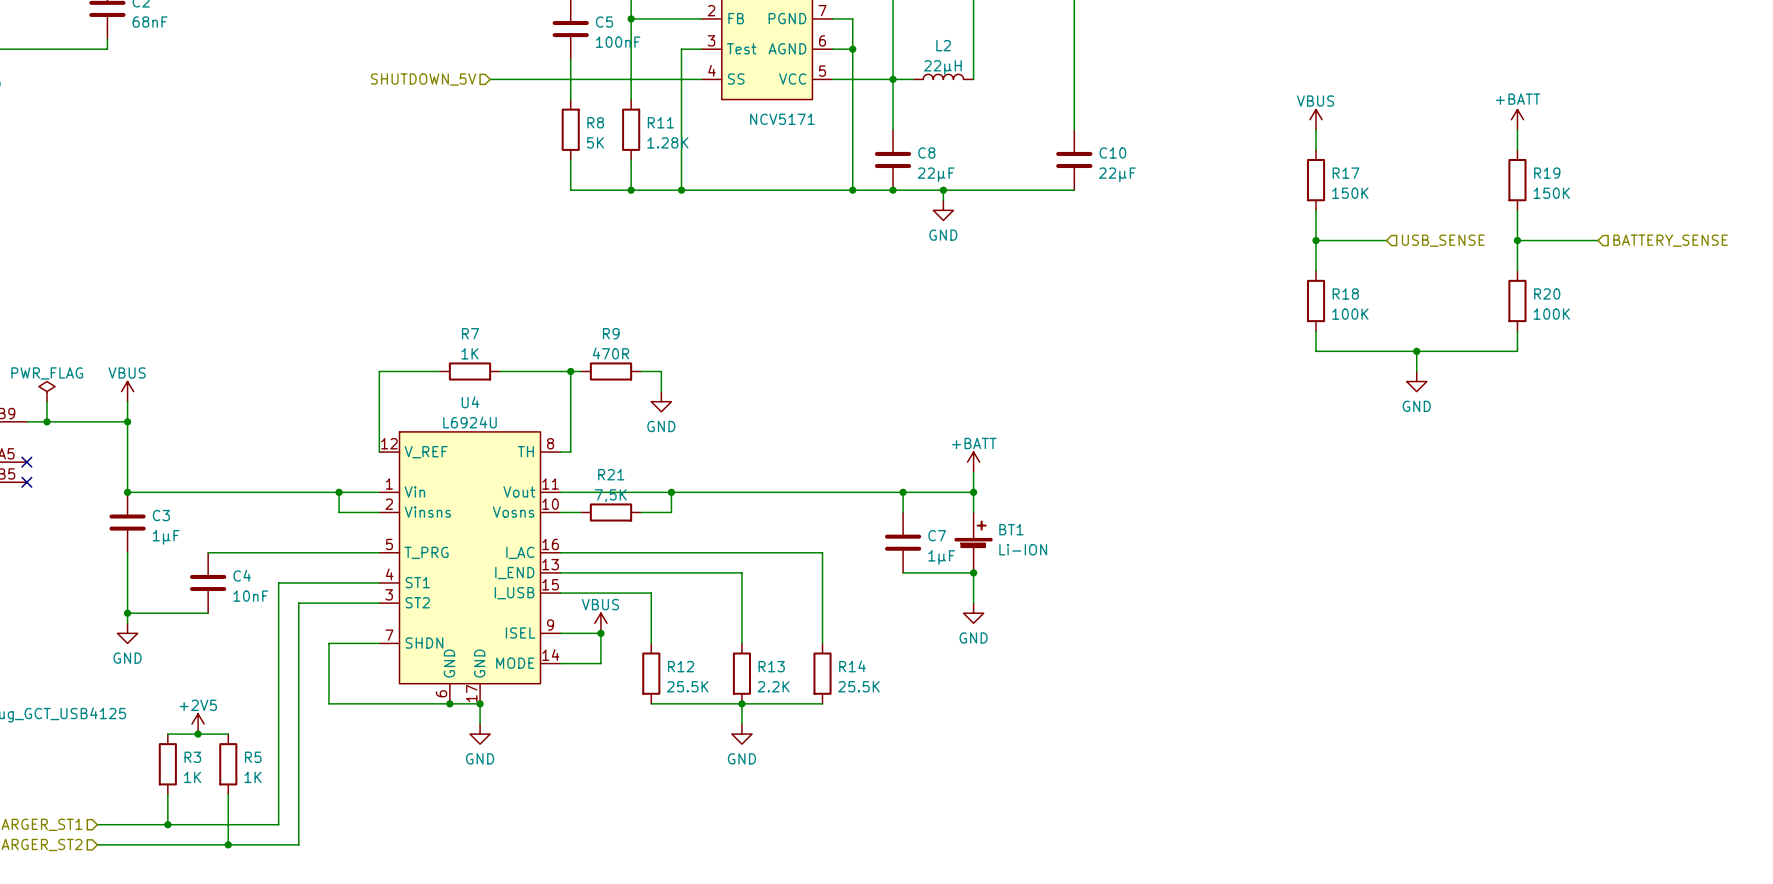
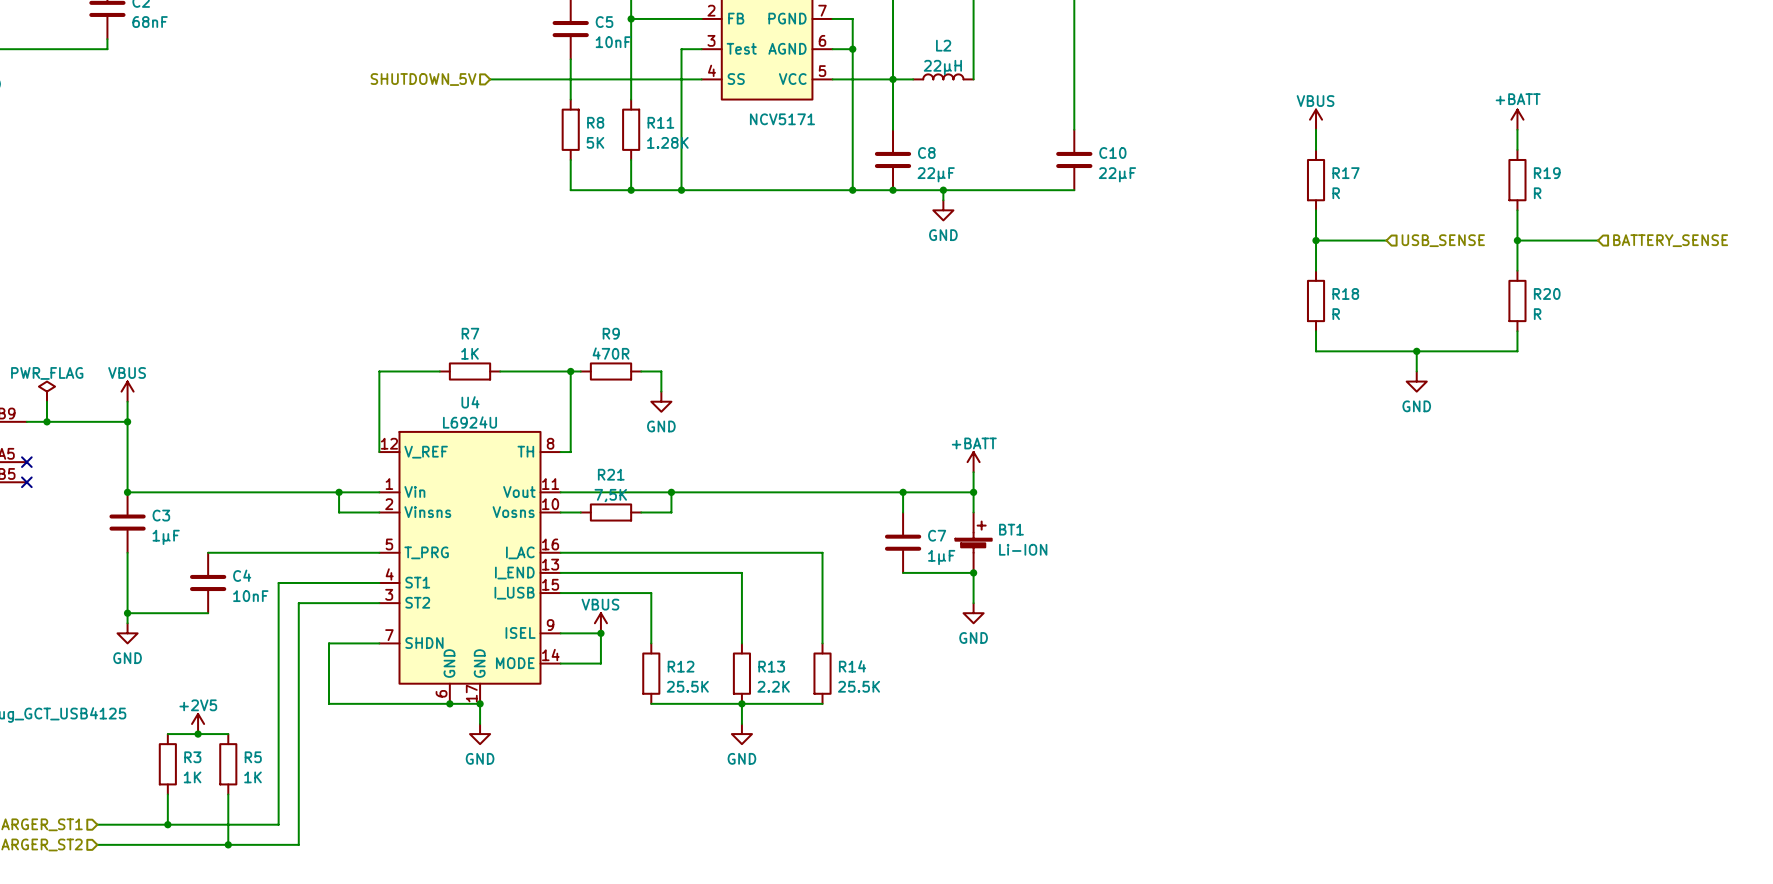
C5 value: 100nF (618, 42) -> 10nF (613, 42)
R17 value: 150K (1350, 193) -> R (1336, 193)
R19 value: 150K (1551, 193) -> R (1537, 193)
R18 value: 100K (1350, 314) -> R (1336, 314)
R20 value: 100K (1551, 314) -> R (1537, 314)

